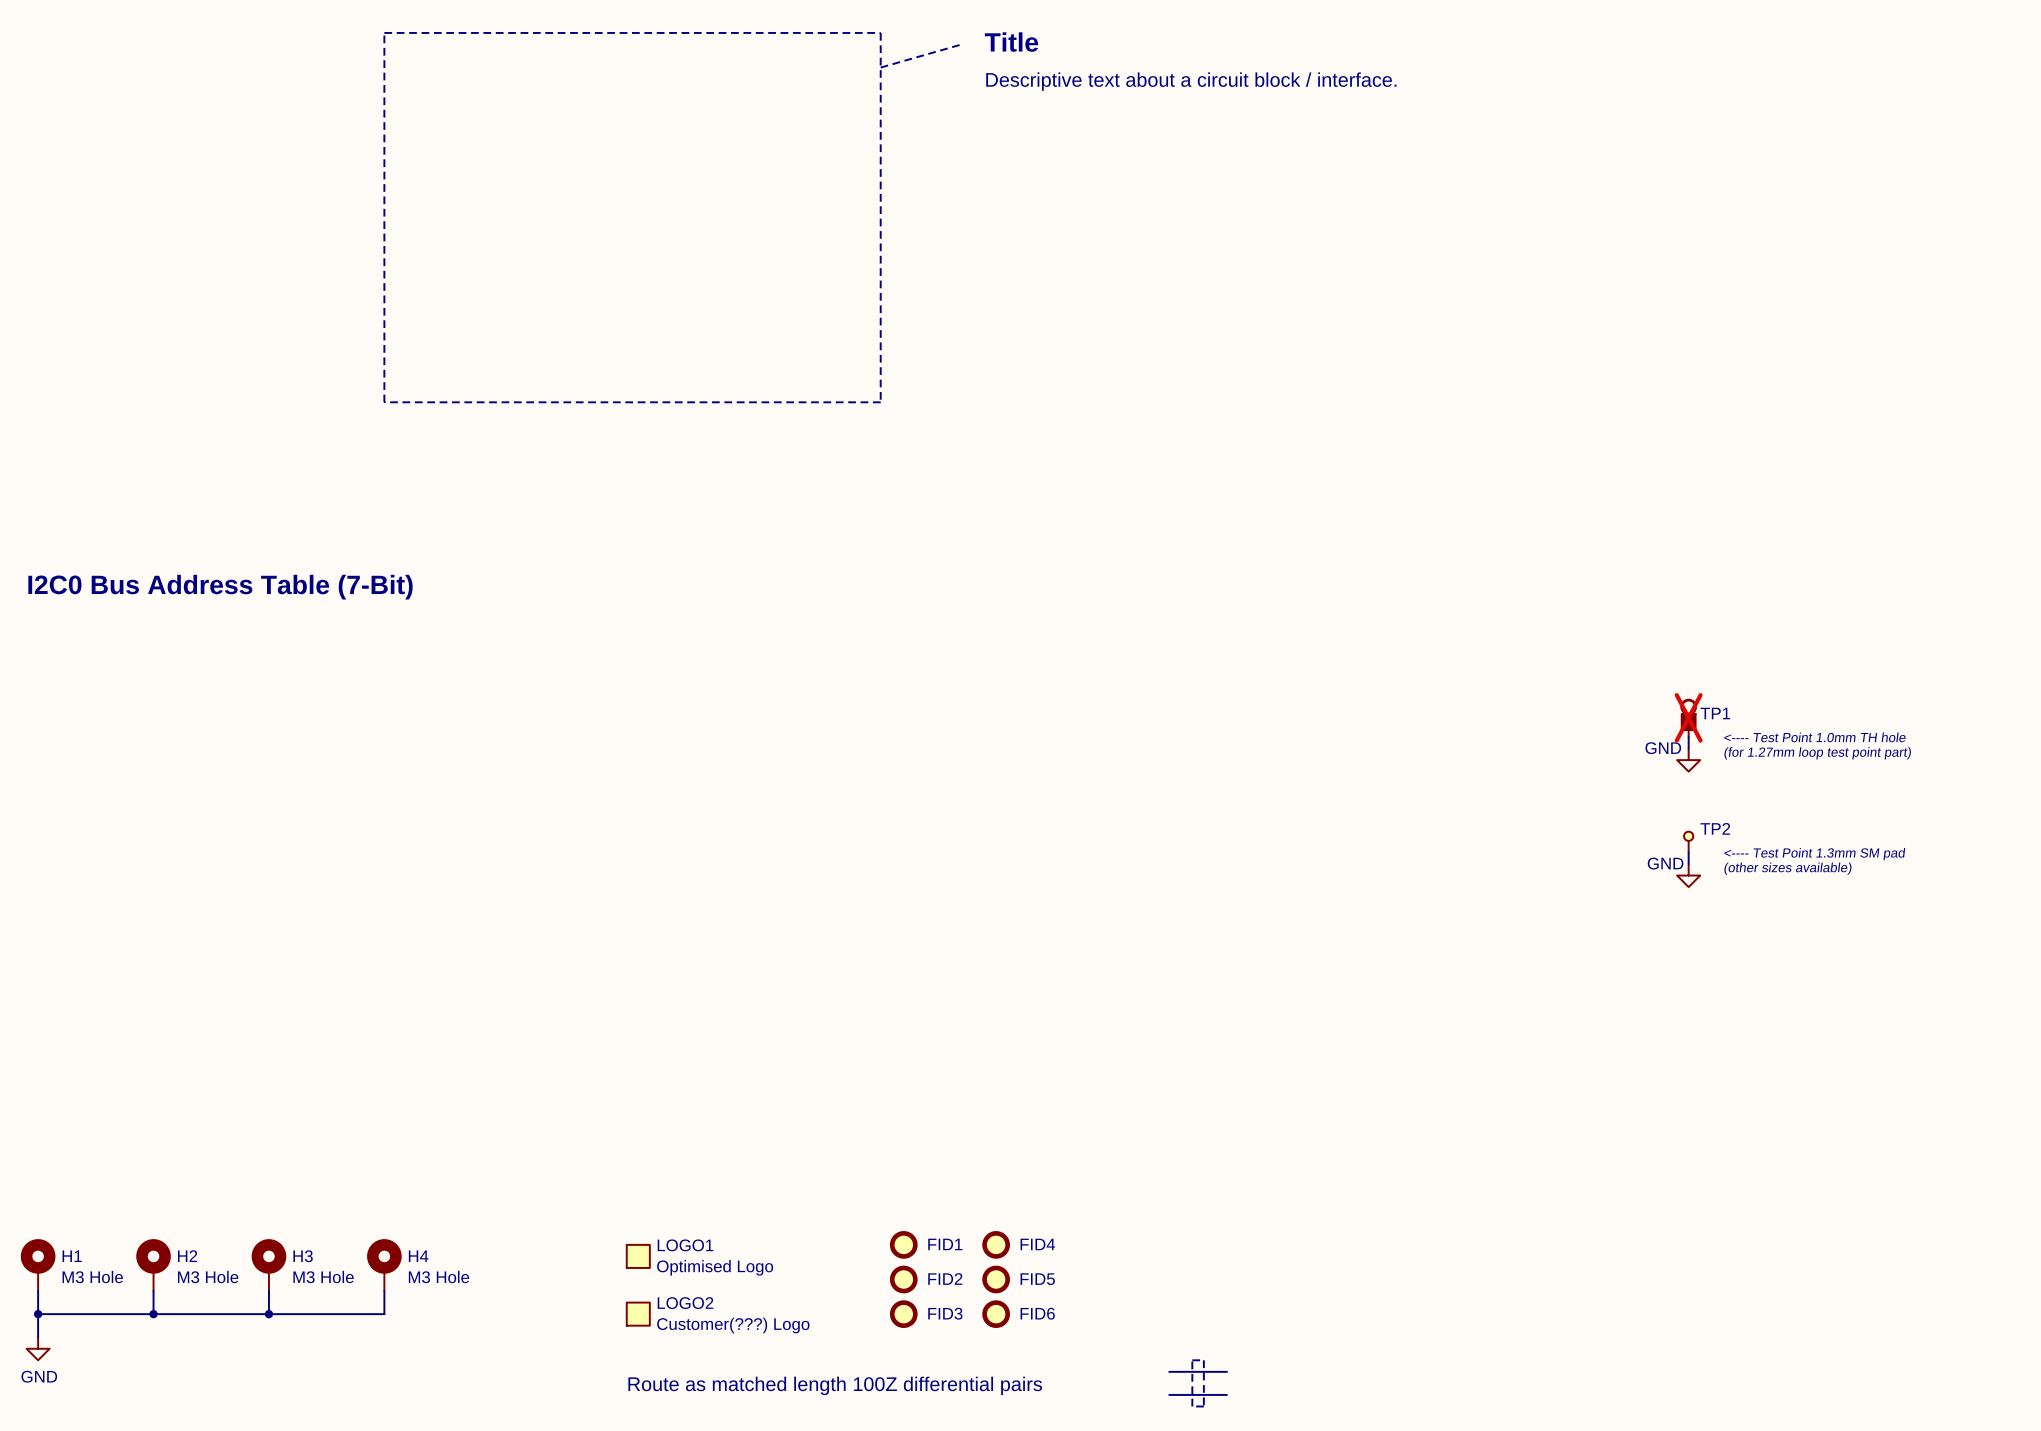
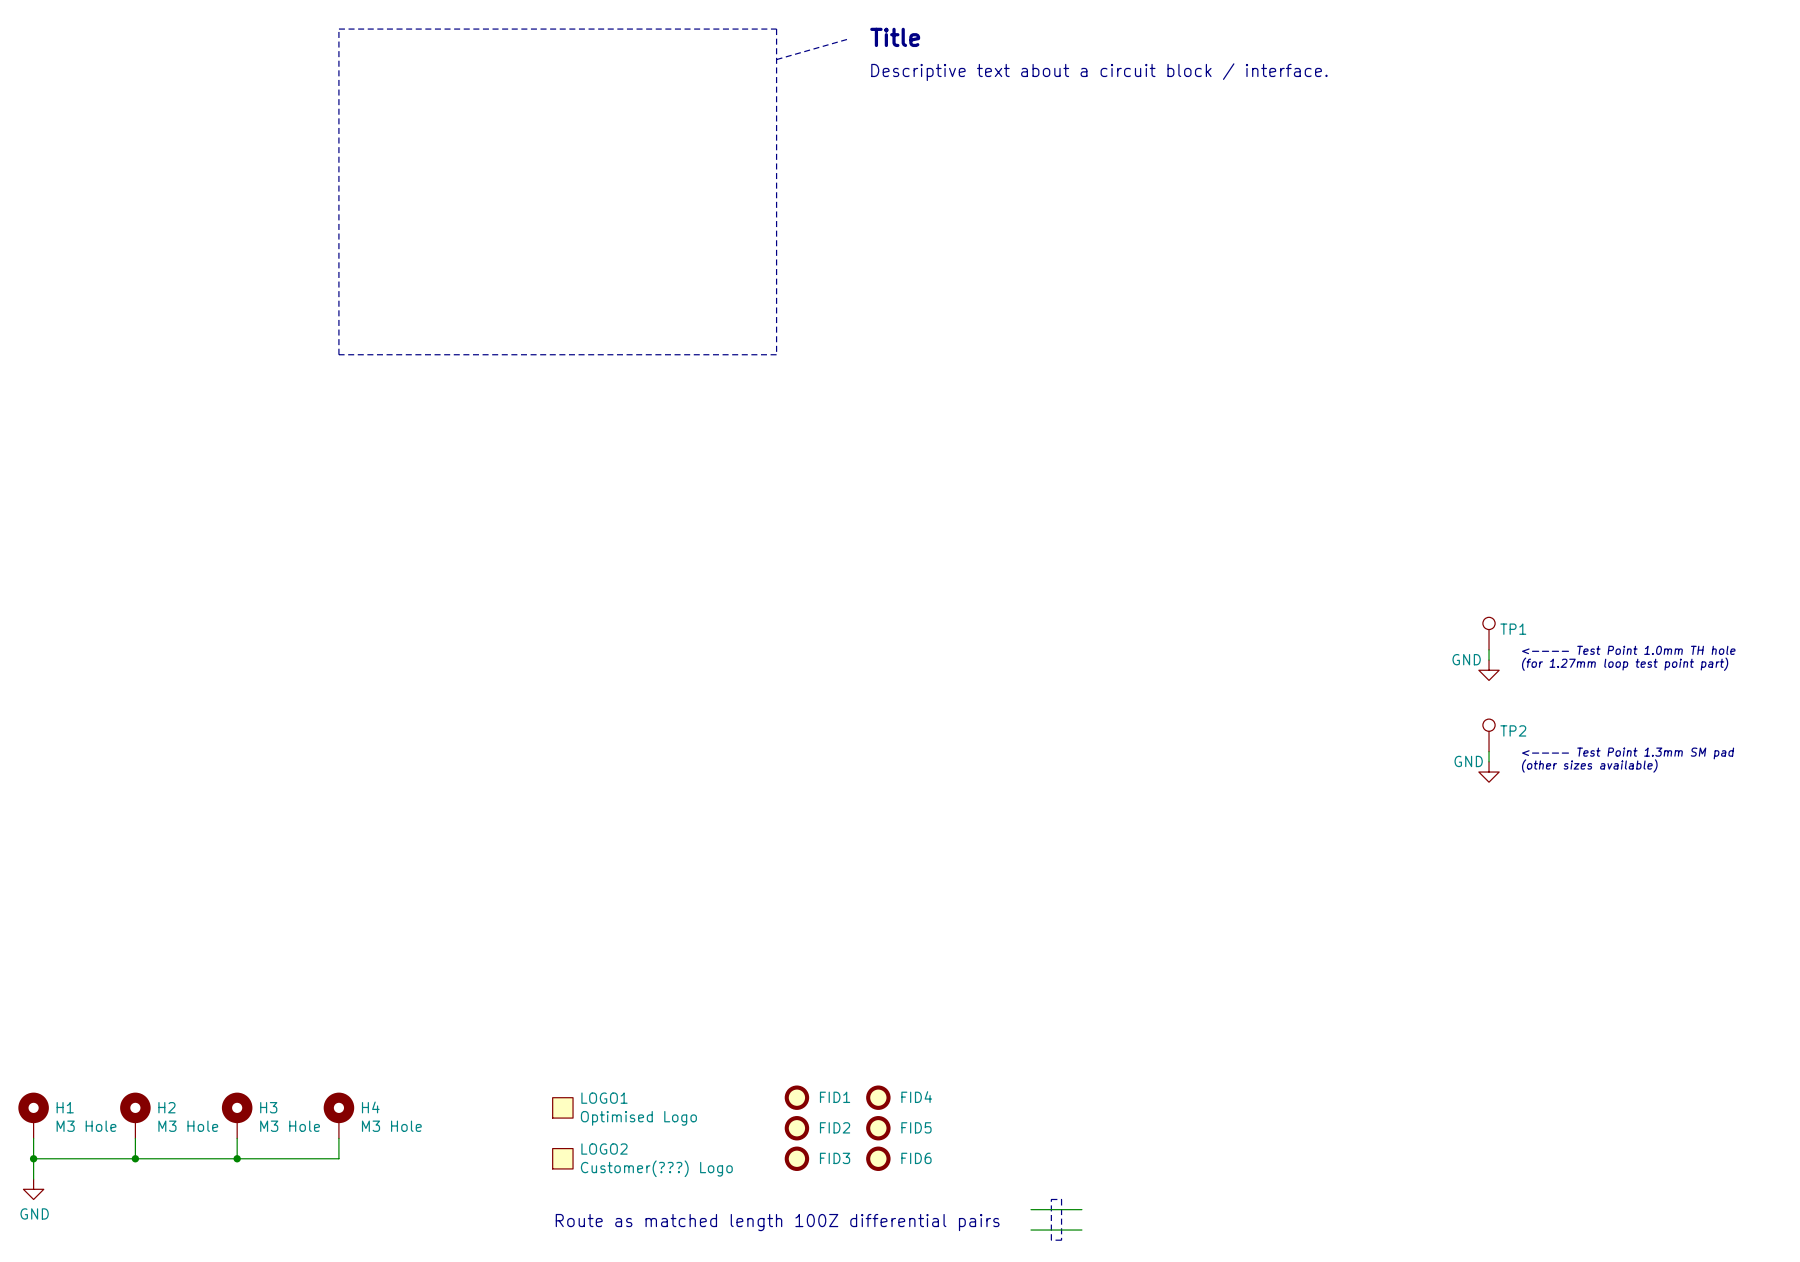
text: I2C0 Bus Address Table (7-Bit) (220, 587) -> none
TP1 symbol: [1680, 698, 1697, 738] -> [1482, 617, 1496, 650]
TP1 do-not-place cross: (1688, 717) -> none
TP2 symbol: [1683, 831, 1694, 853] -> [1482, 719, 1496, 752]

